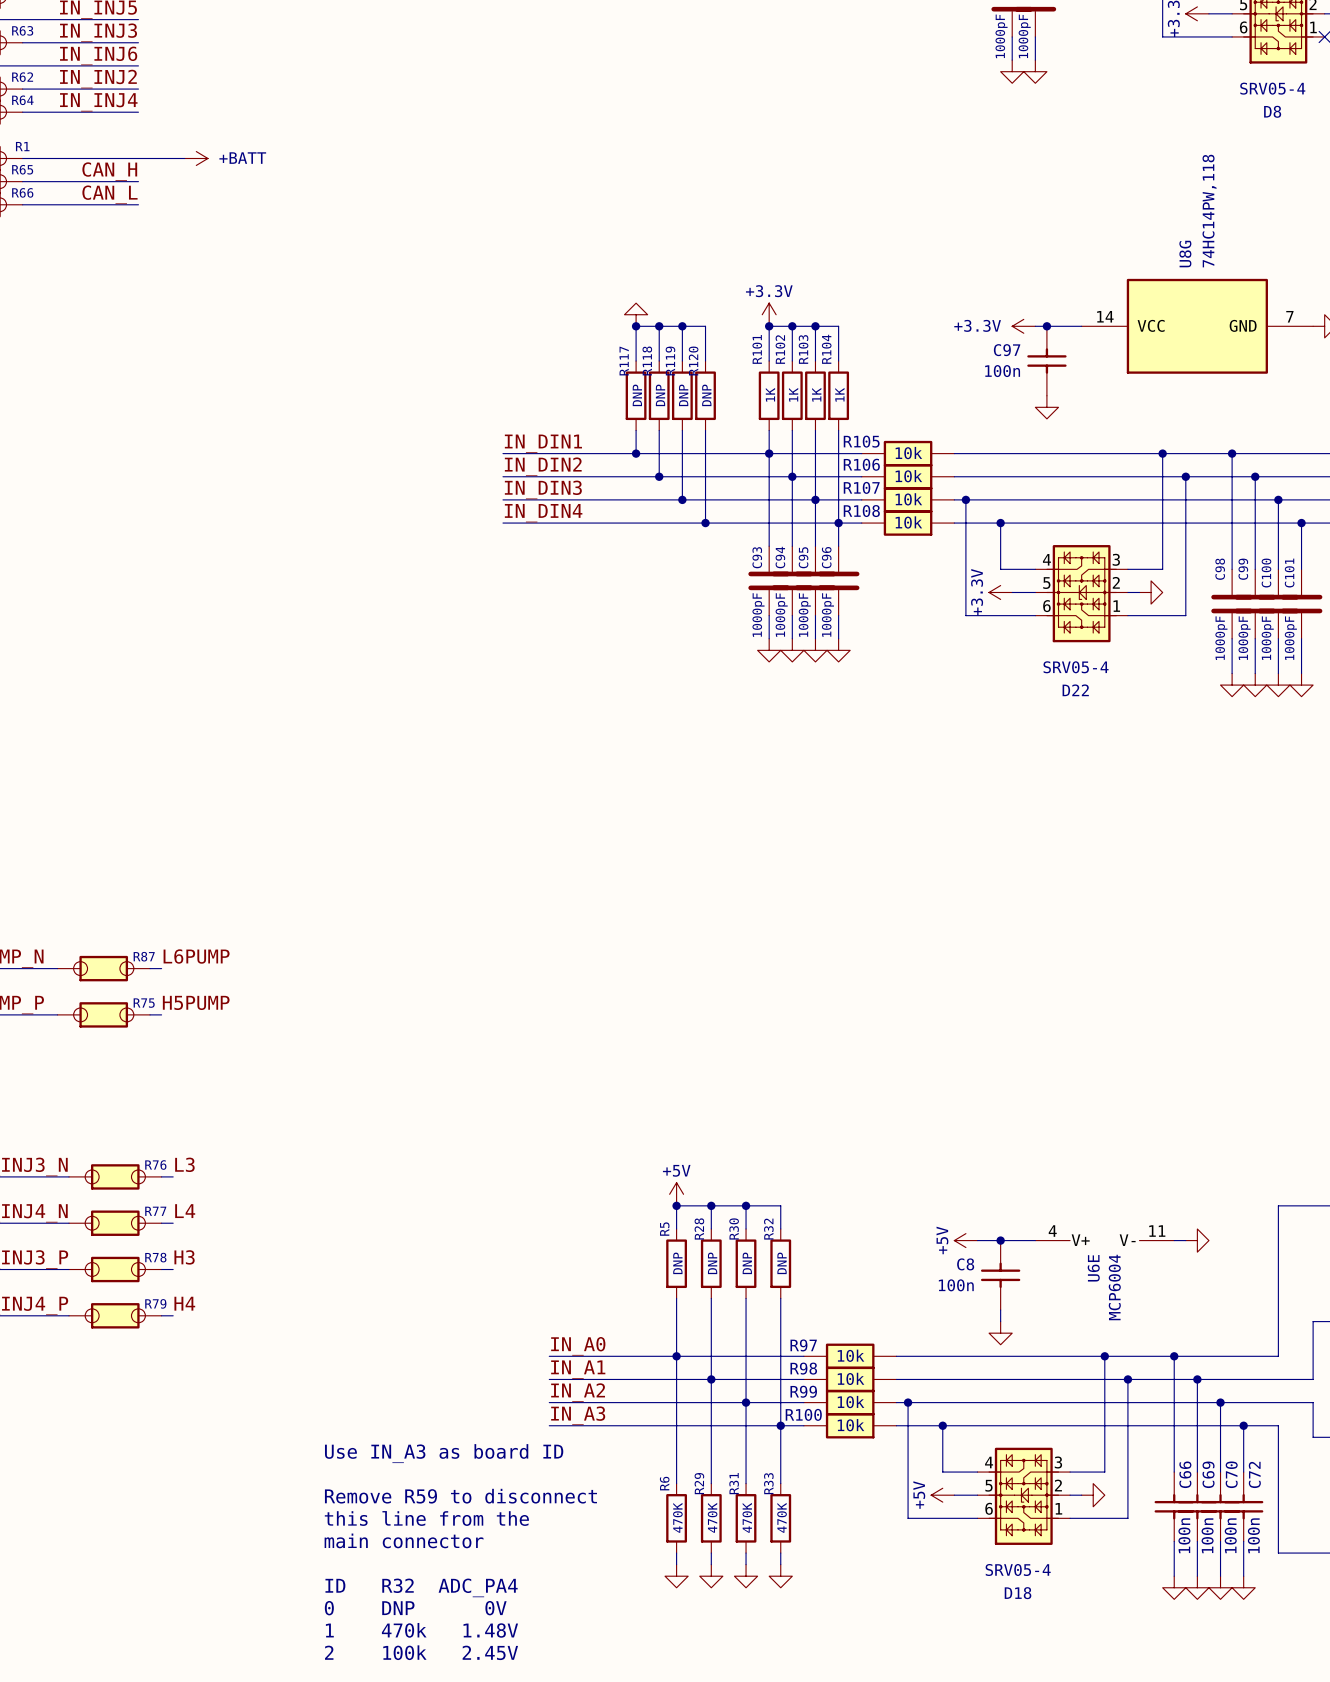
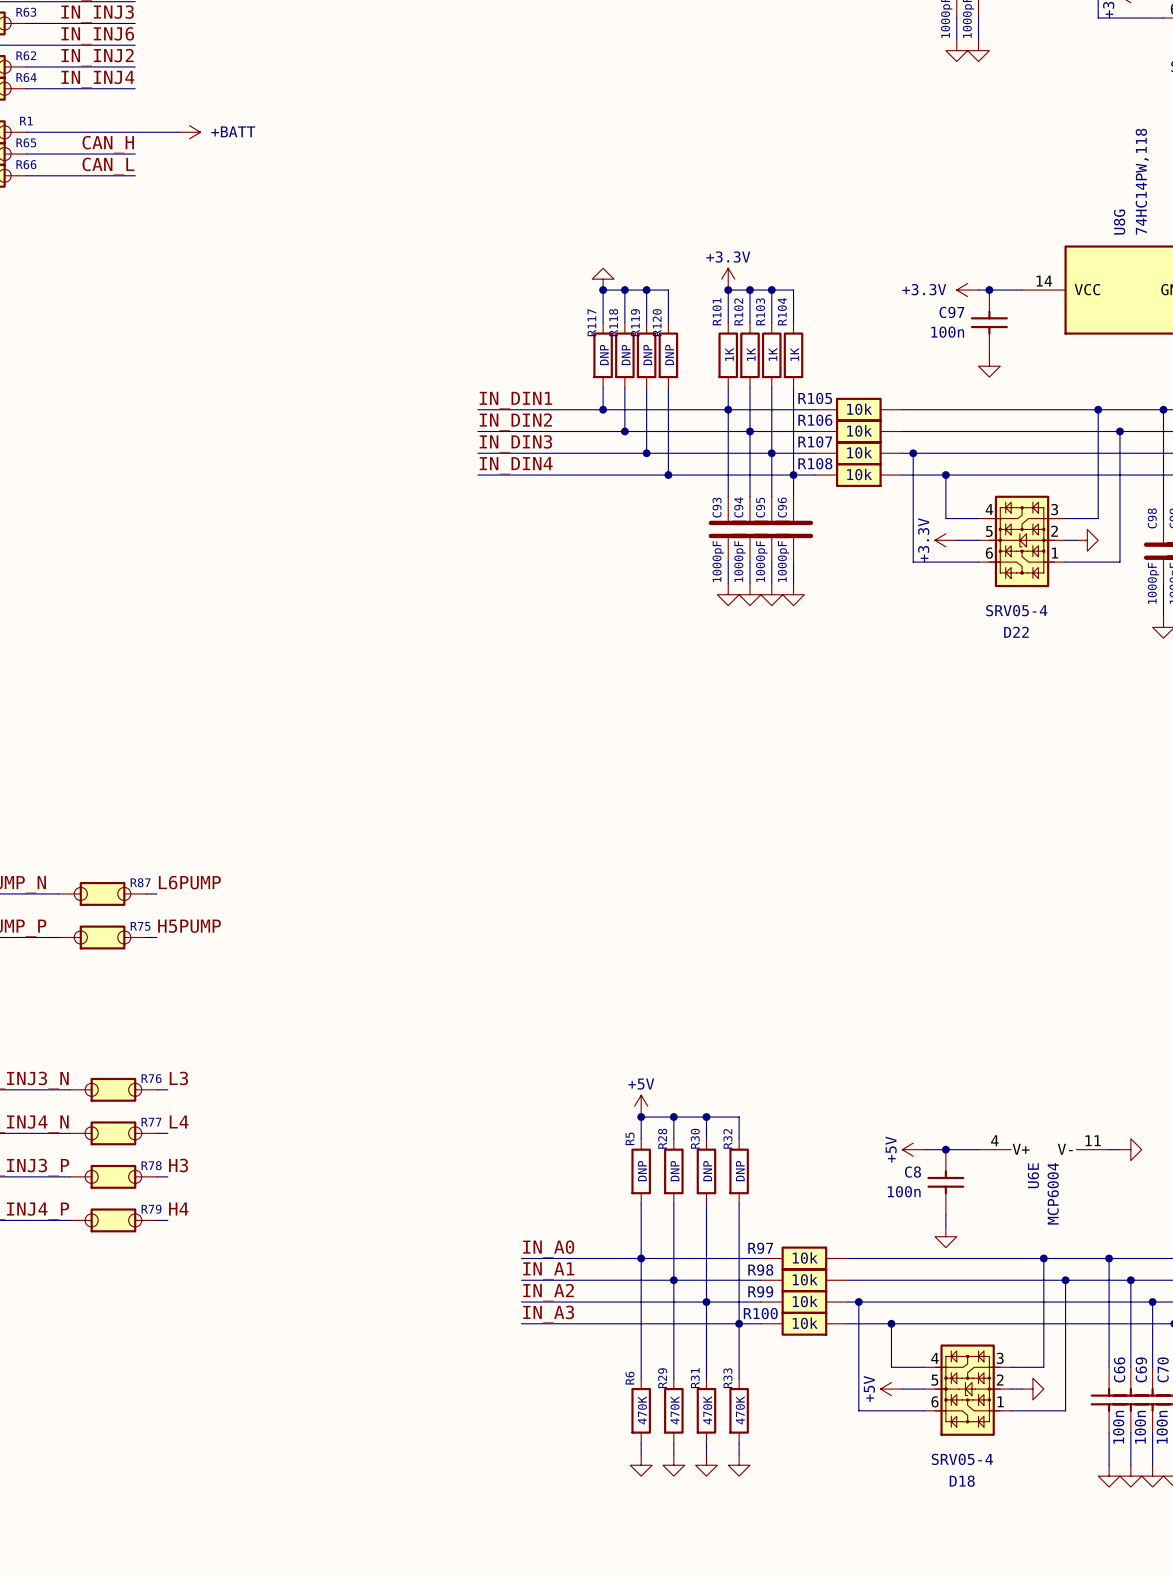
text: Use IN_A3 as board ID (444, 1453) -> none
text: Remove R59 to disconnect (460, 1496) -> none
text: this line from the (426, 1518) -> none
text: main connector (404, 1540) -> none
text: ID R32 ADC_PA4 (421, 1587) -> none
text: 0 DNP 0V (415, 1608) -> none
text: 1 470k 1.48V (421, 1630) -> none
text: 2 100k 2.45V (421, 1652) -> none

